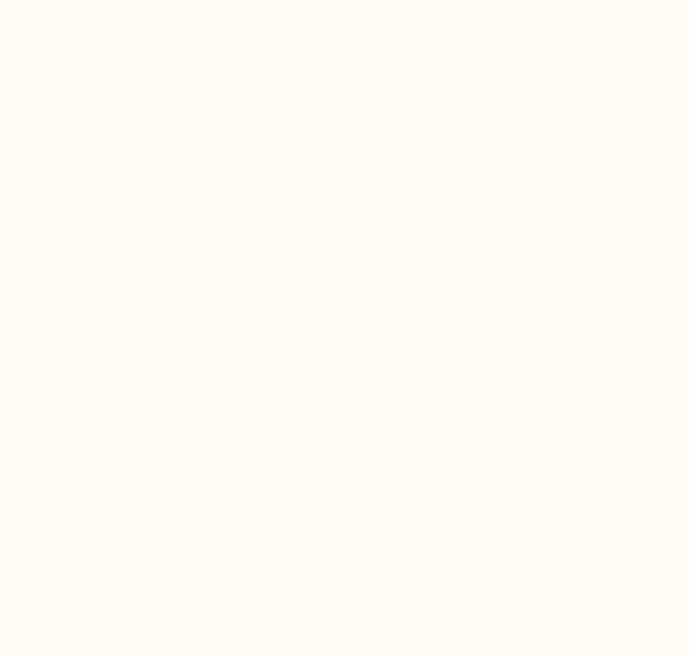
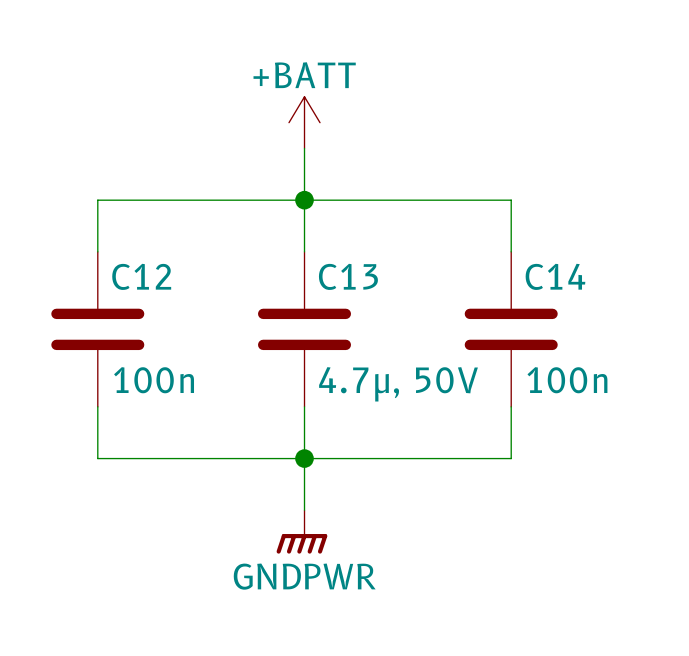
power symbol: none -> +BATT (304, 122)
wire: none -> (304, 148) (304, 251)
junction: none -> (304, 200)
wire: none -> (97, 251) (97, 200) (511, 200) (511, 251)
C12: none -> 100n (97, 329)
C13: none -> 4.7μ, 50V (304, 329)
C14: none -> 100n (511, 329)
wire: none -> (97, 406) (97, 458) (511, 458) (511, 406)
wire: none -> (304, 406) (304, 510)
junction: none -> (304, 458)
power symbol: none -> GNDPWR (301, 531)

